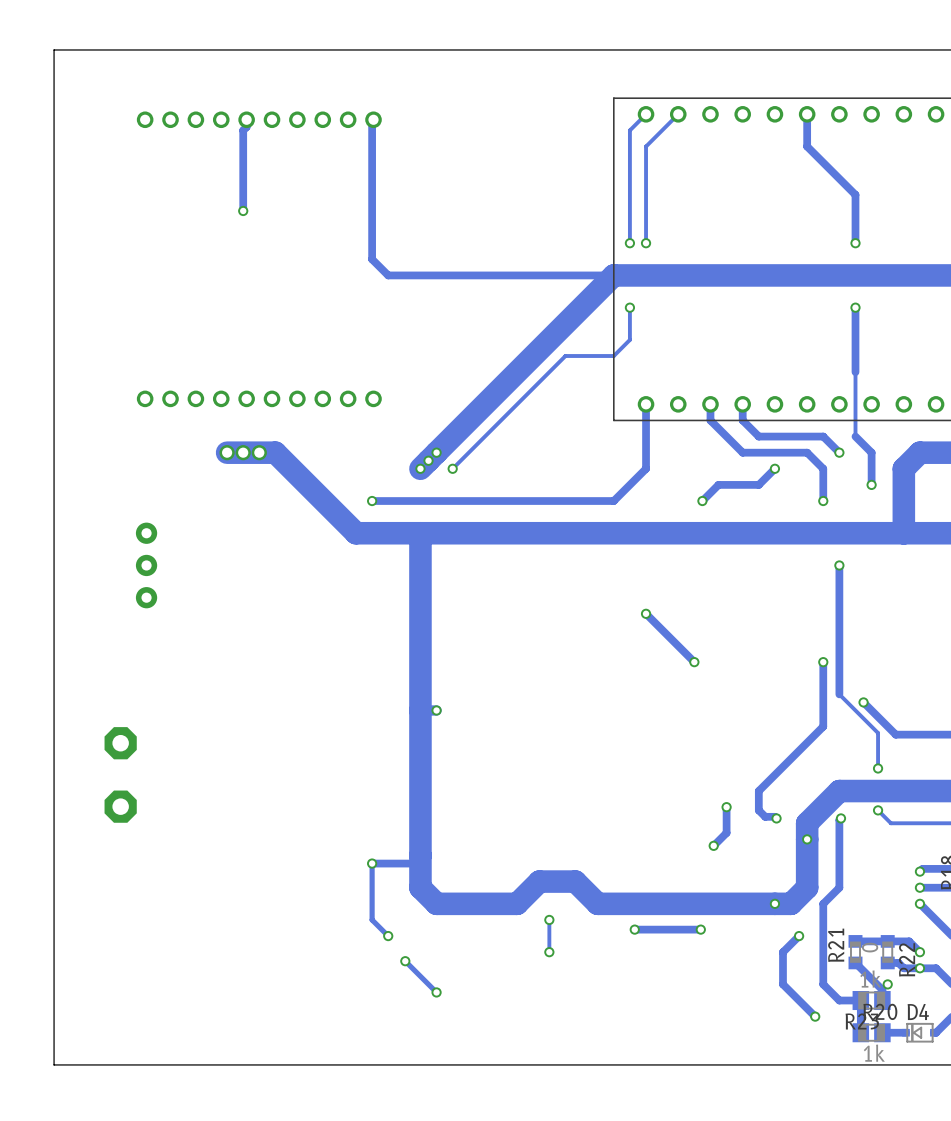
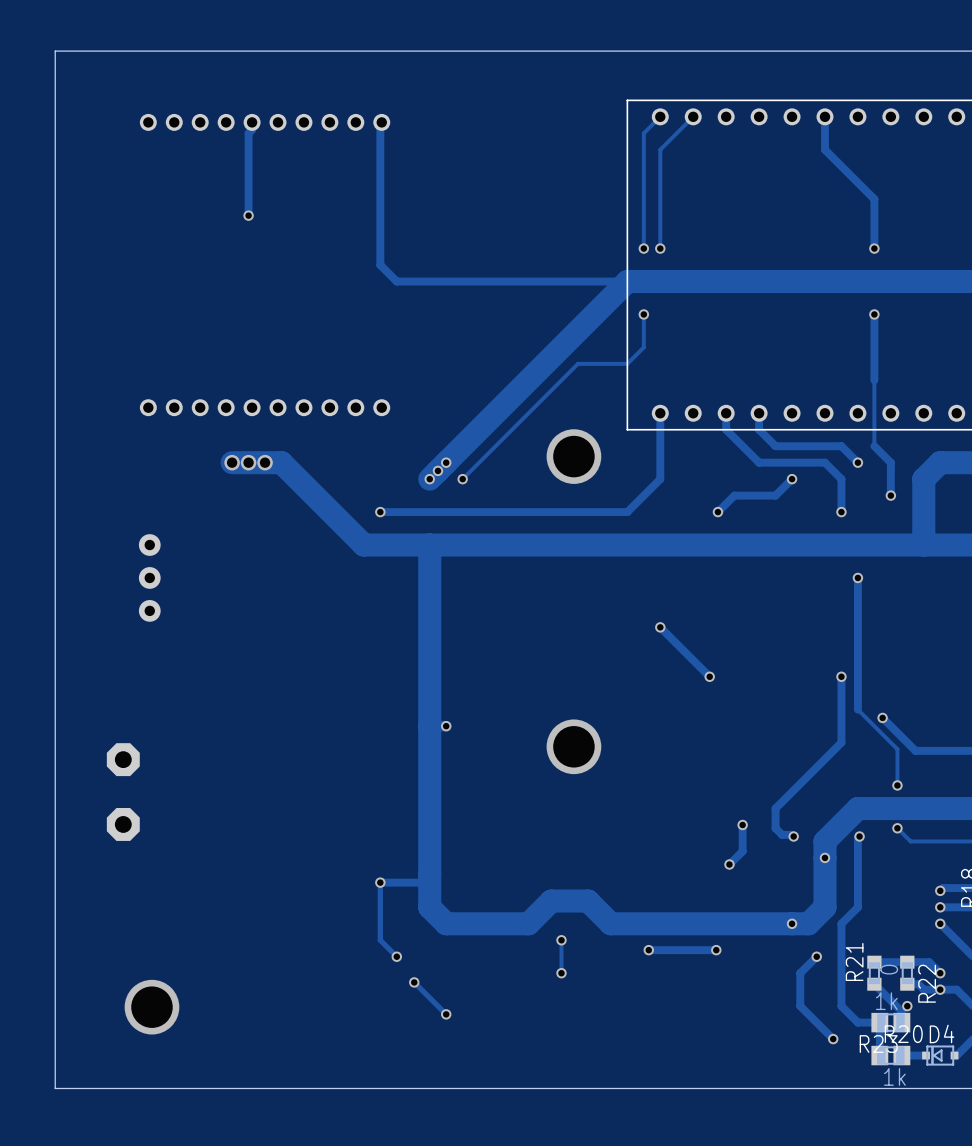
via: none -> (573, 456)
via: none -> (573, 746)
via: none -> (151, 1007)

